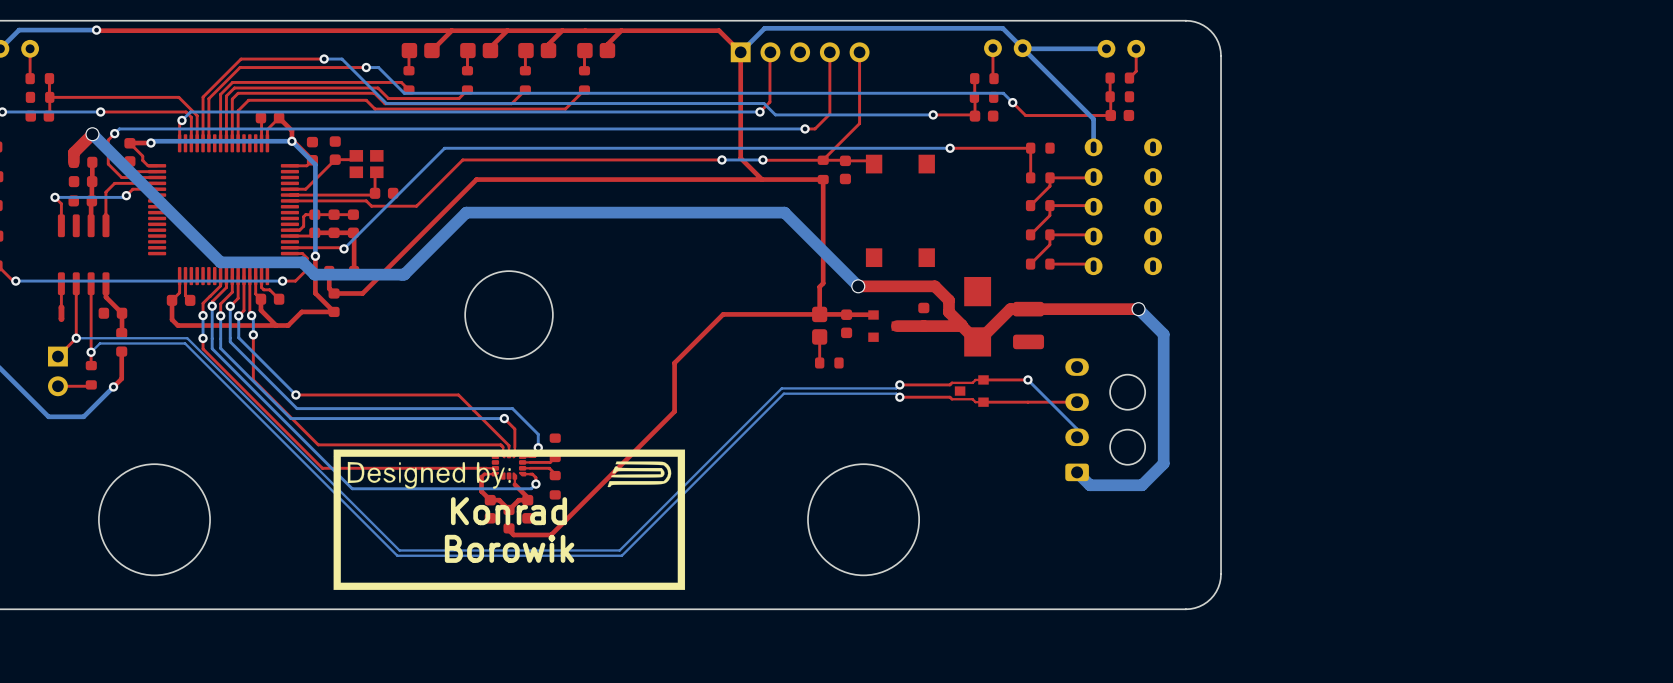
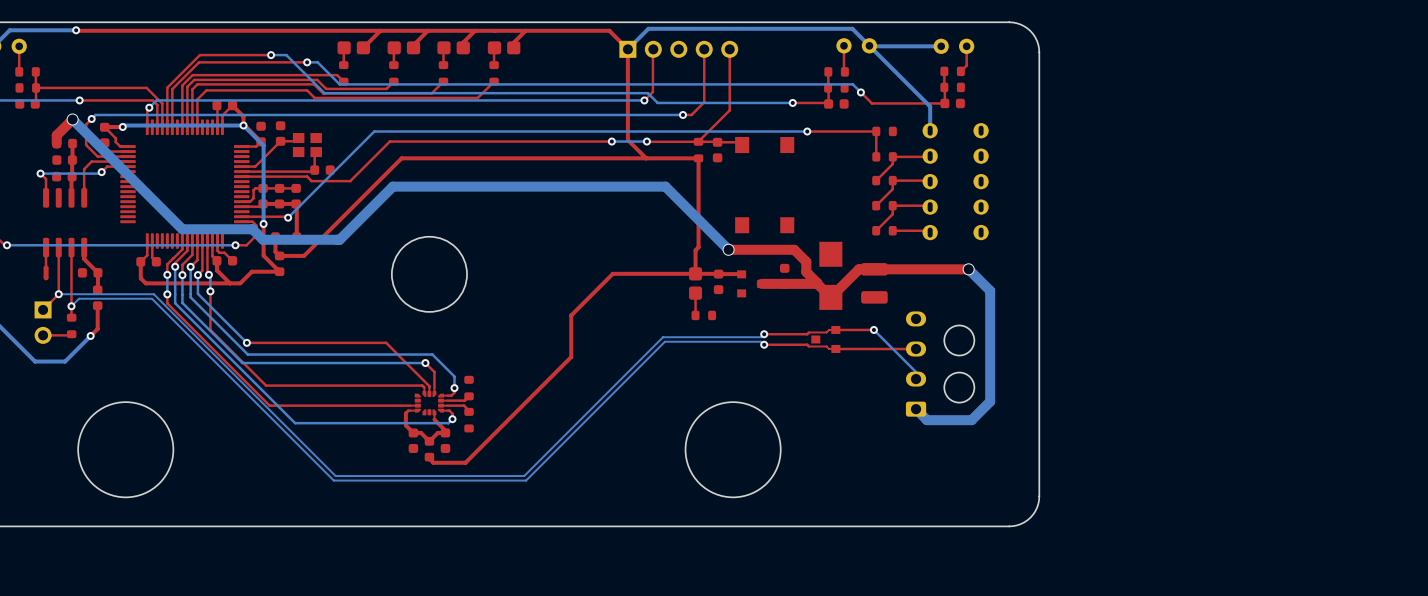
drawing: [333, 449, 686, 590] -> none
text: Konrad (509, 511) -> none
text: Borowik (509, 548) -> none

